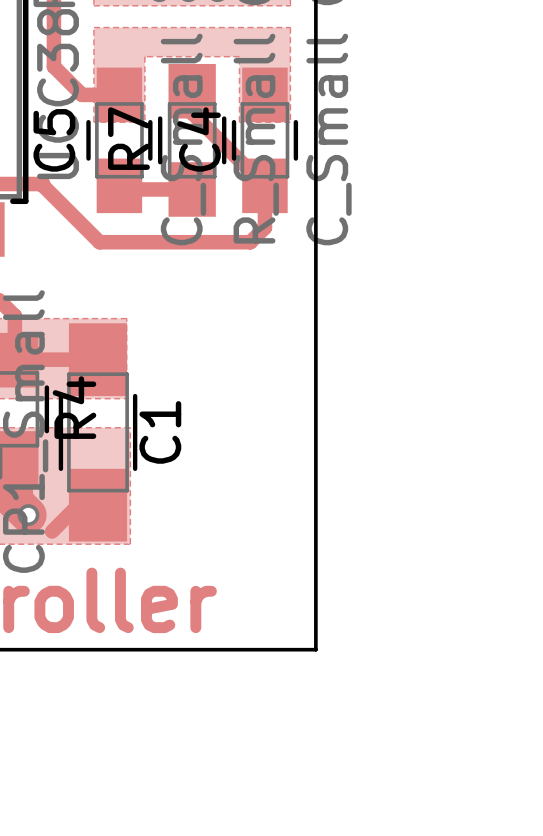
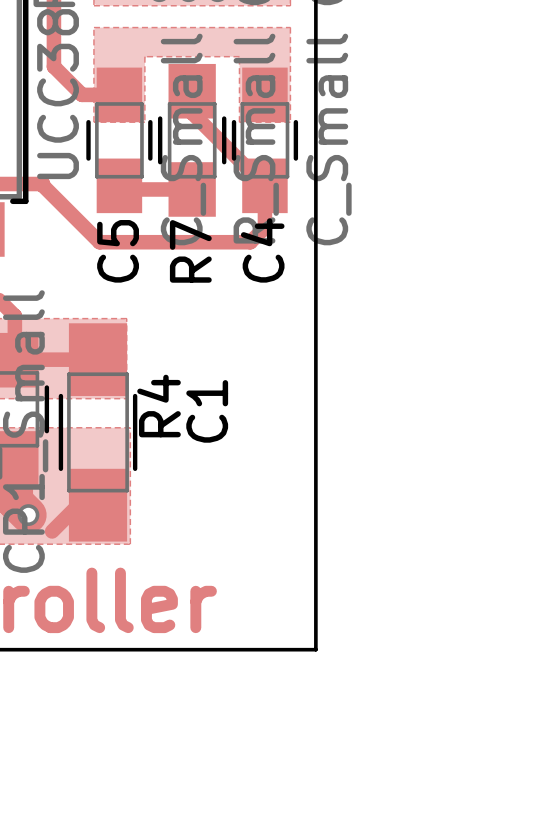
R7 name position: R7 (128, 138) -> R7 (190, 251)
C4 name position: C4 (199, 139) -> C4 (262, 250)
C5 name position: C5 (54, 140) -> C5 (118, 251)
R4 name position: R4 (74, 407) -> R4 (159, 406)
C1 name position: C1 (160, 432) -> C1 (207, 411)

